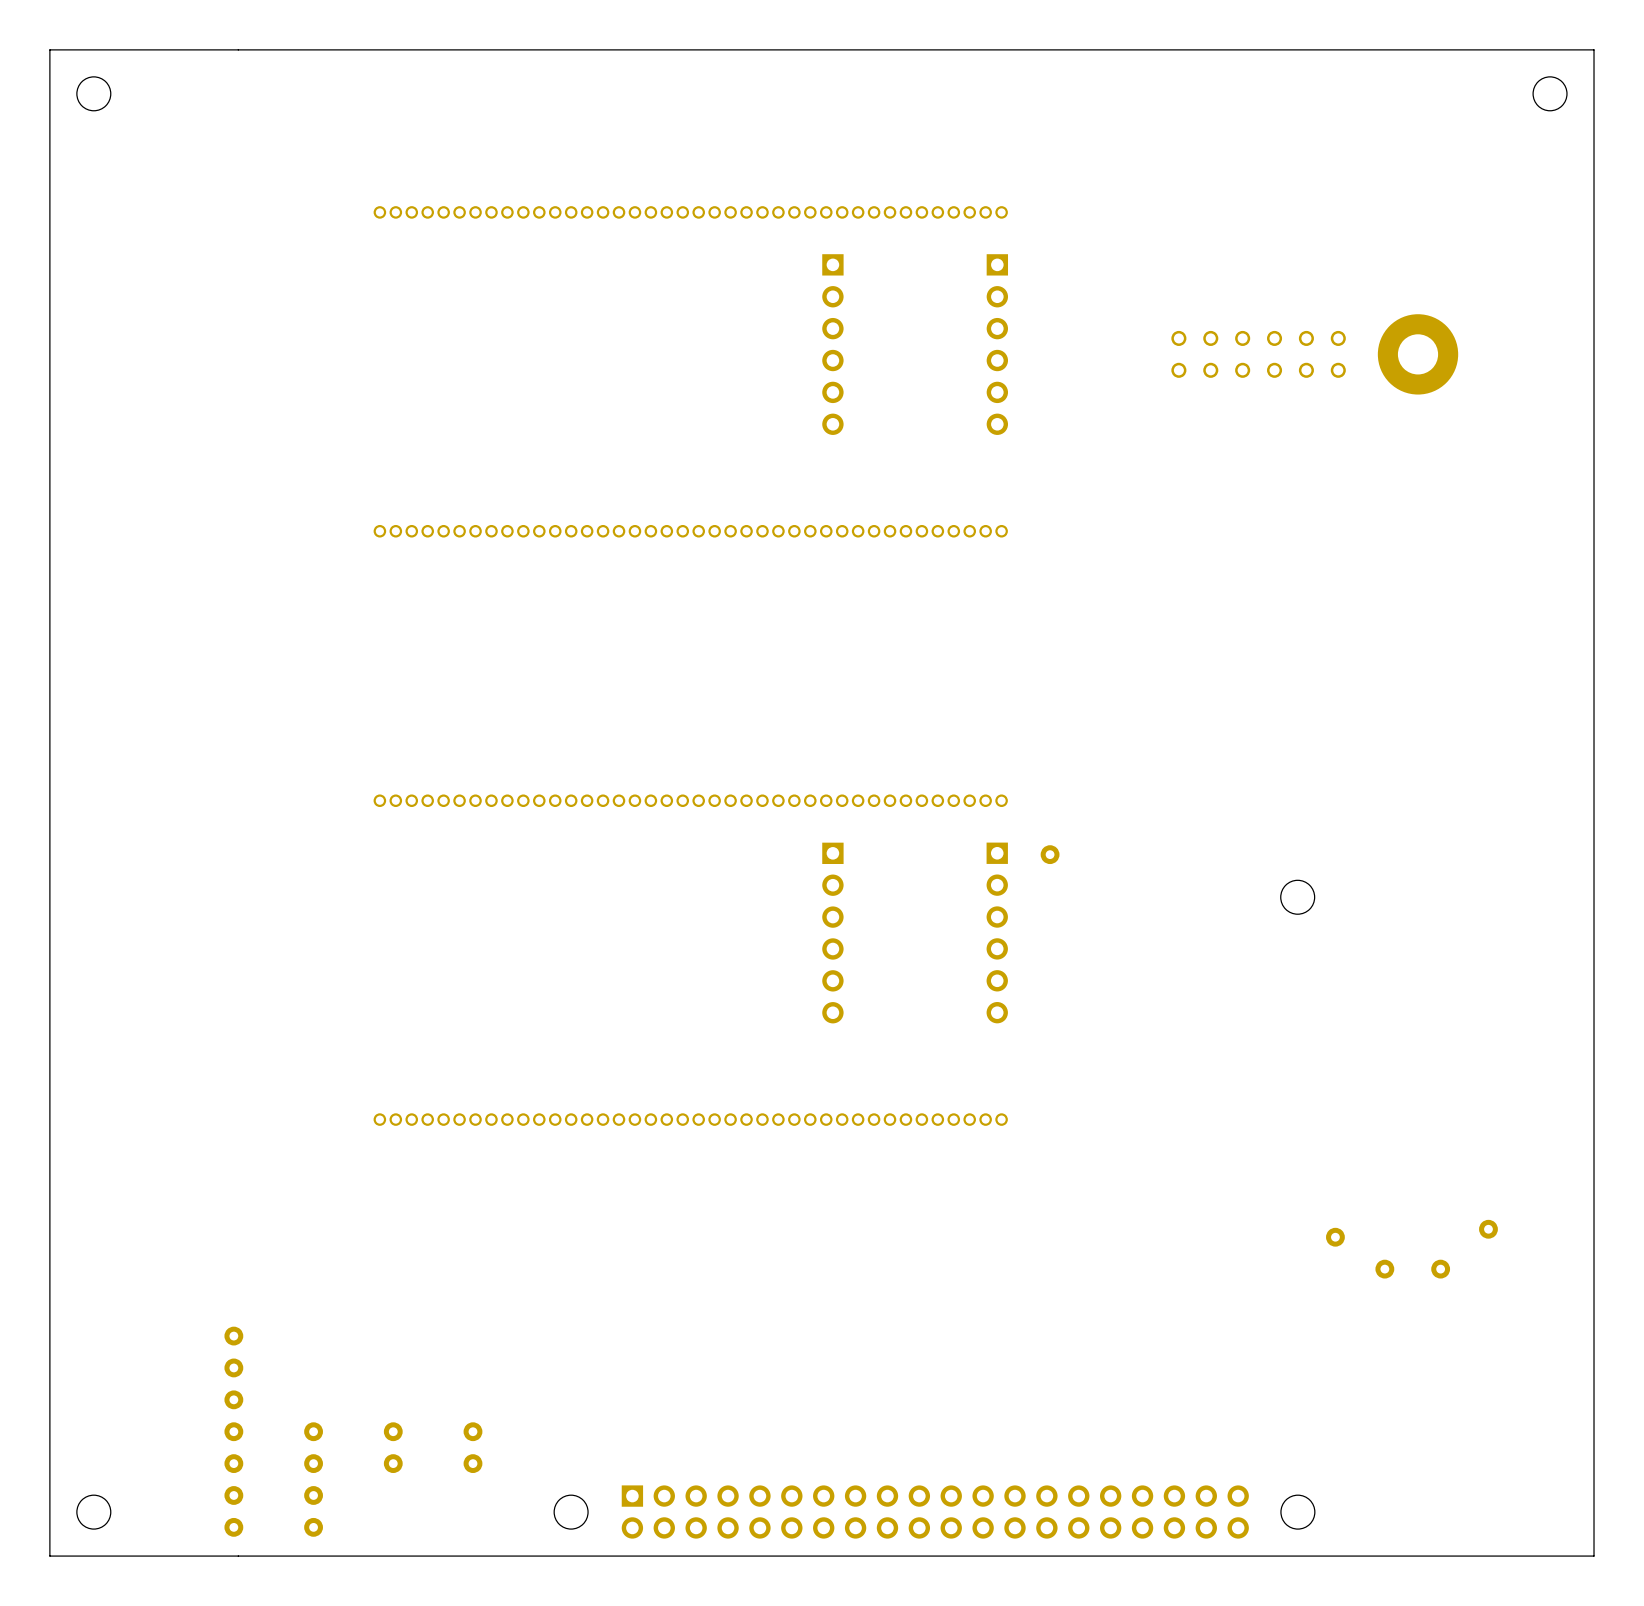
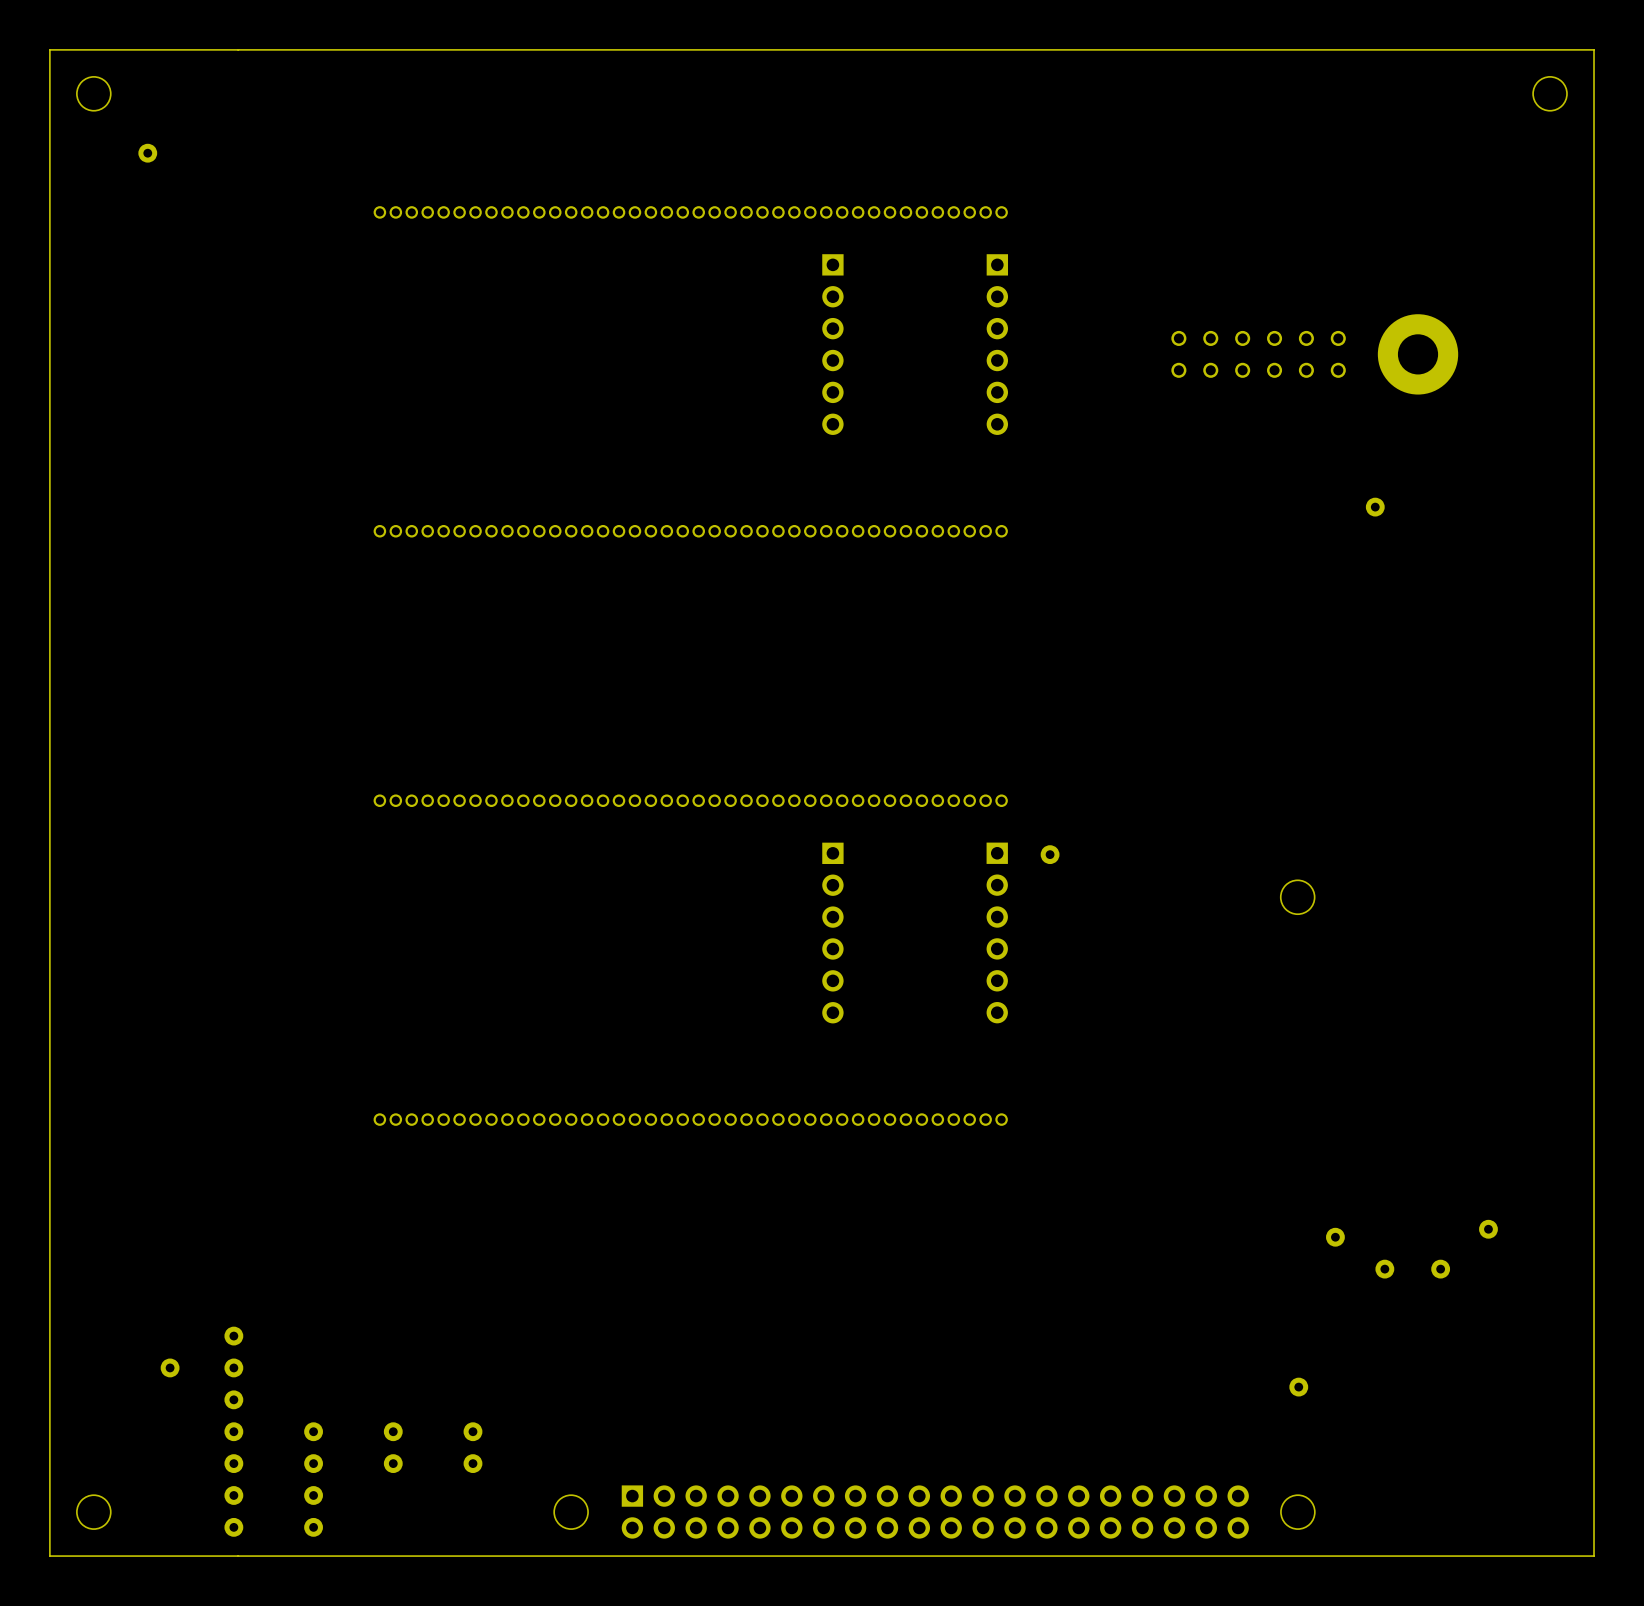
part: none -> (147, 153)
part: none -> (1375, 507)
part: none -> (170, 1367)
part: none -> (1298, 1387)

